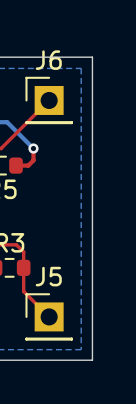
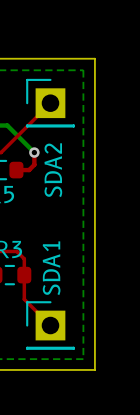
J6 name: J6 (48, 60) -> none
text: none -> SDA2 (53, 170)
text: none -> SDA1 (51, 268)
J5 name: J5 (48, 276) -> none

